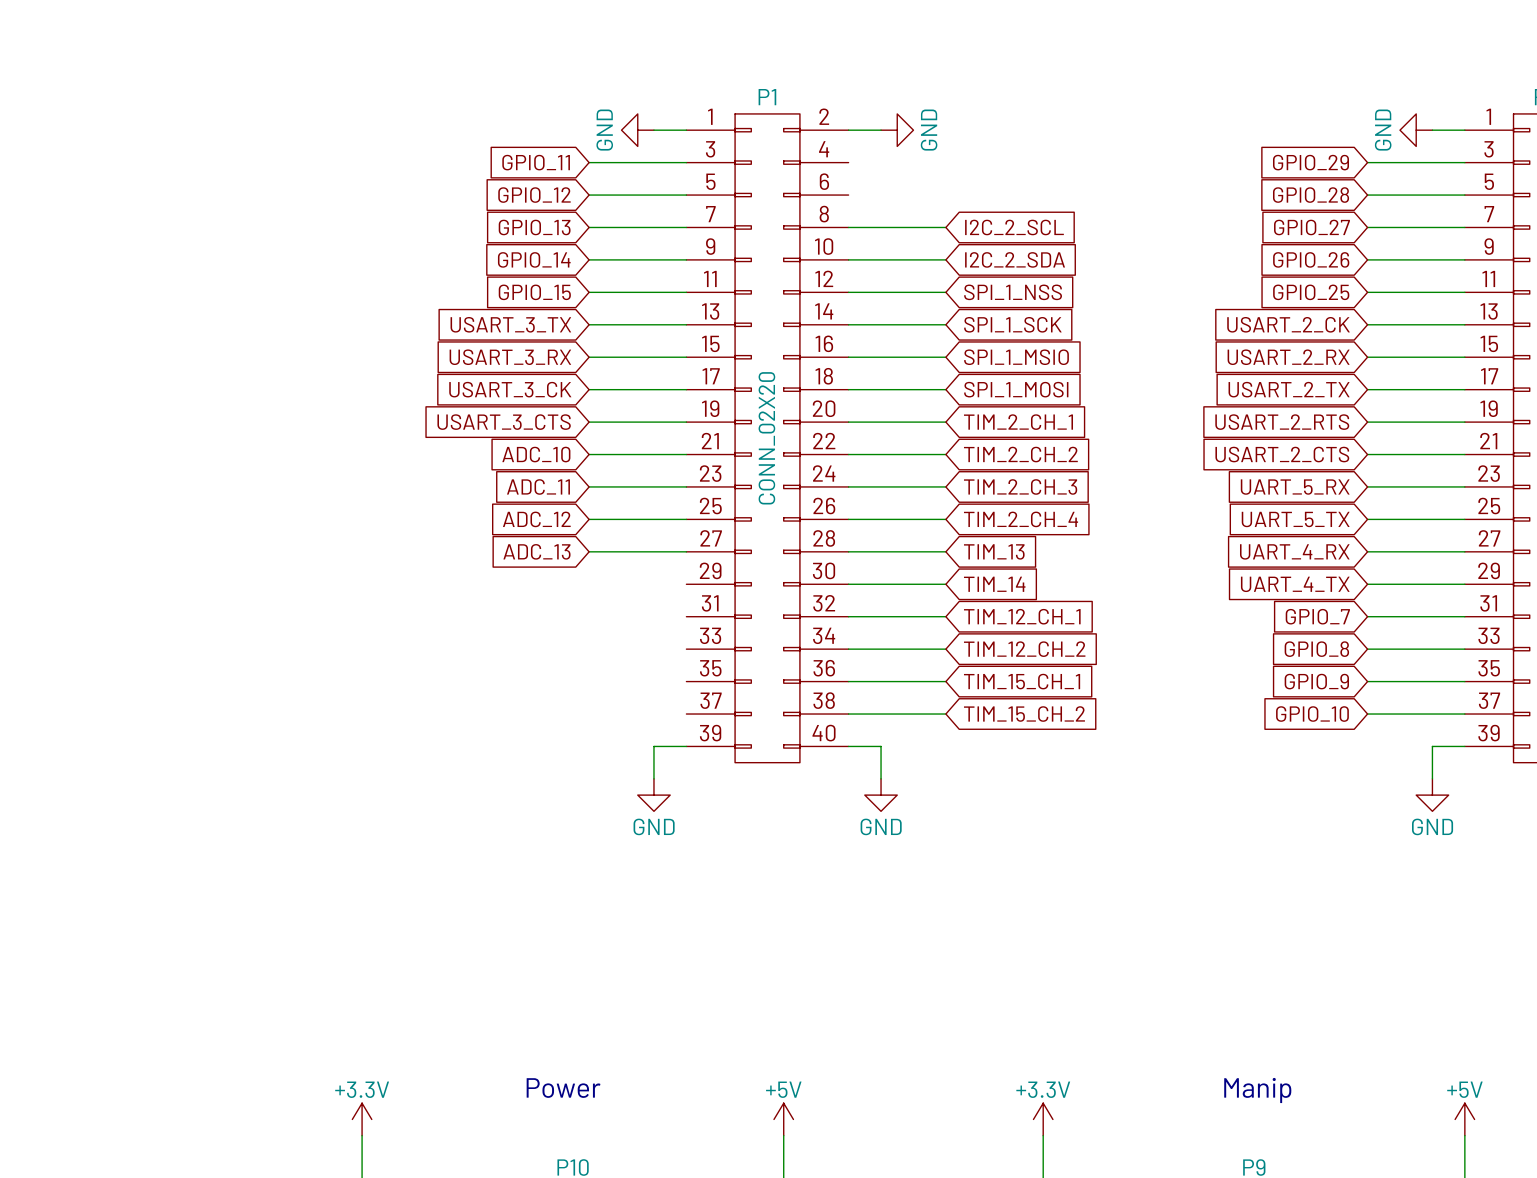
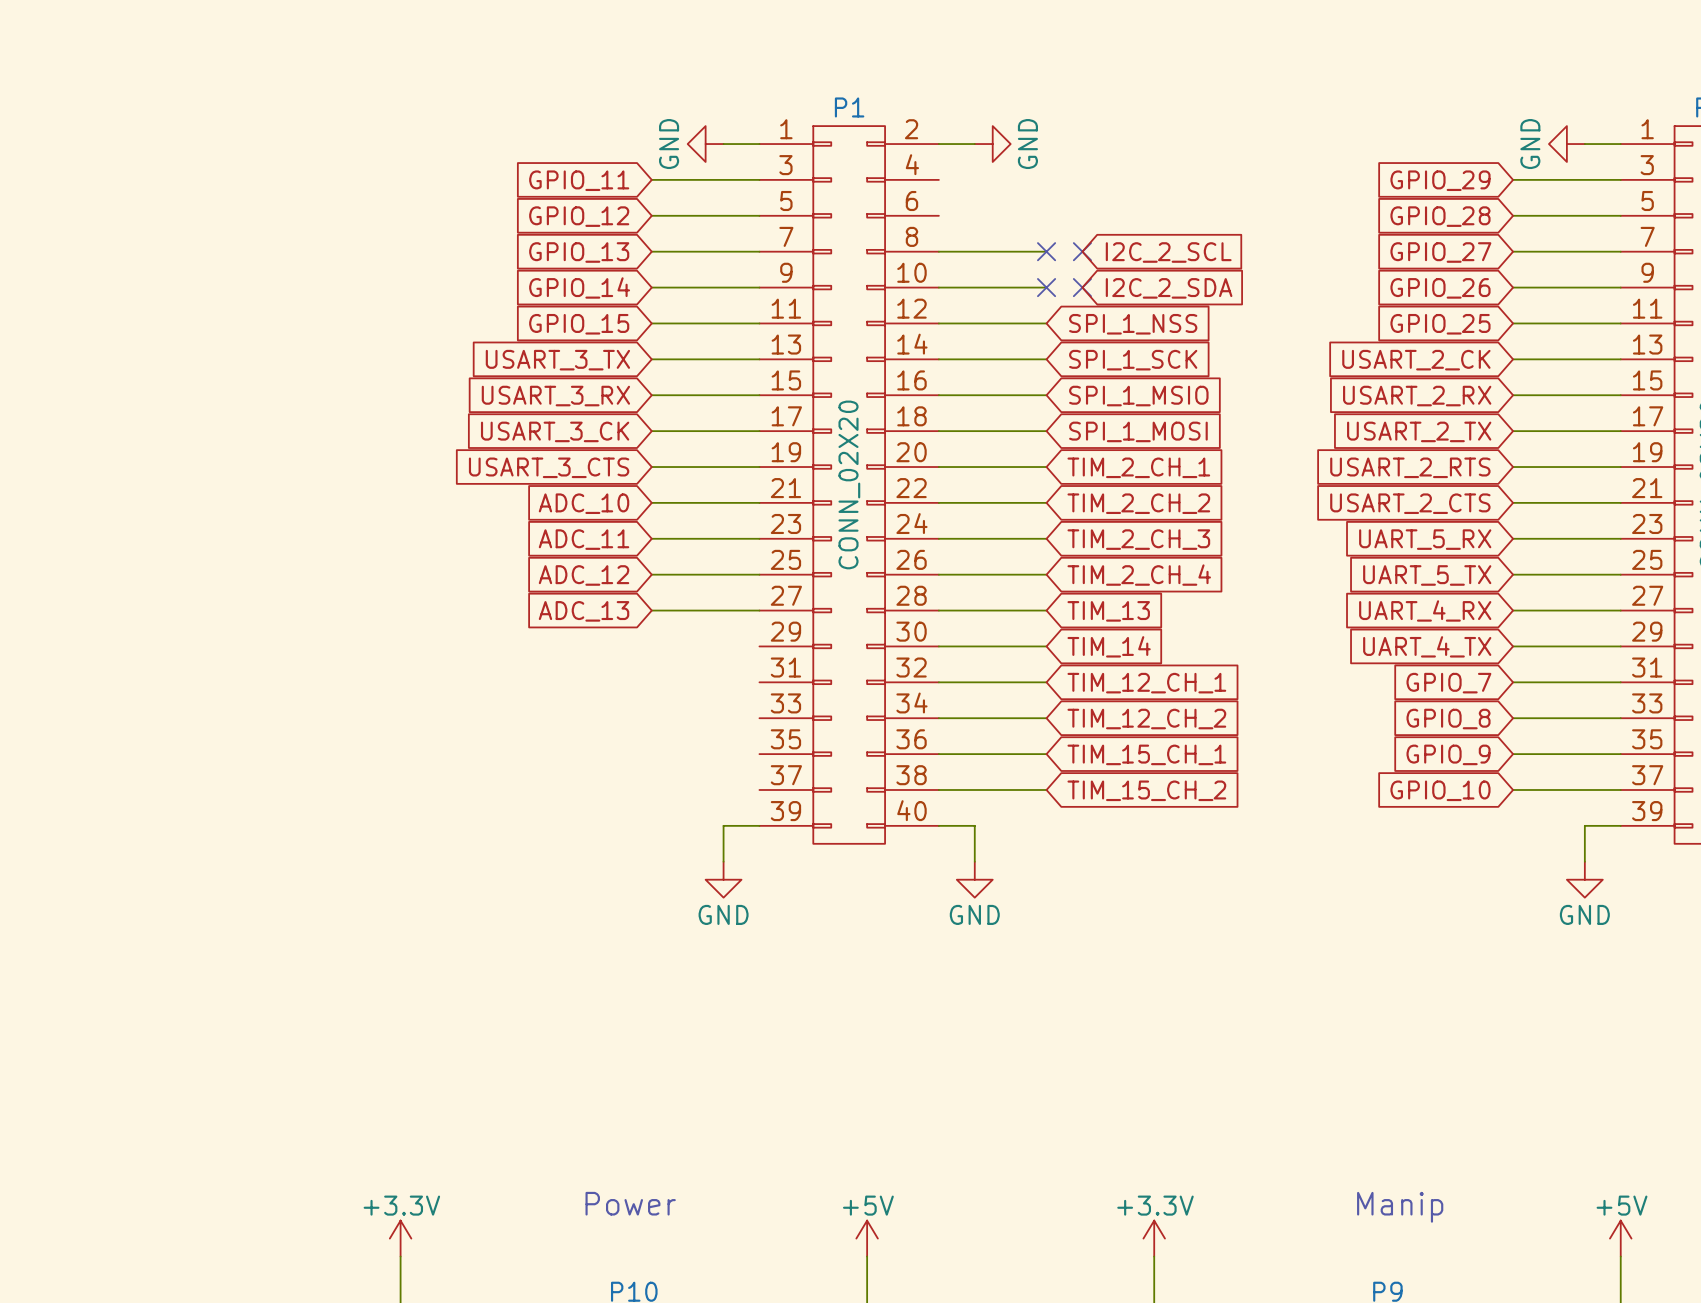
no-connect mark: none -> (1046, 251)
no-connect mark: none -> (1082, 251)
global label position: I2C_2_SCL (1014, 227) -> I2C_2_SCL (1168, 252)
no-connect mark: none -> (1046, 287)
no-connect mark: none -> (1082, 287)
global label position: I2C_2_SDA (1015, 259) -> I2C_2_SDA (1169, 288)

